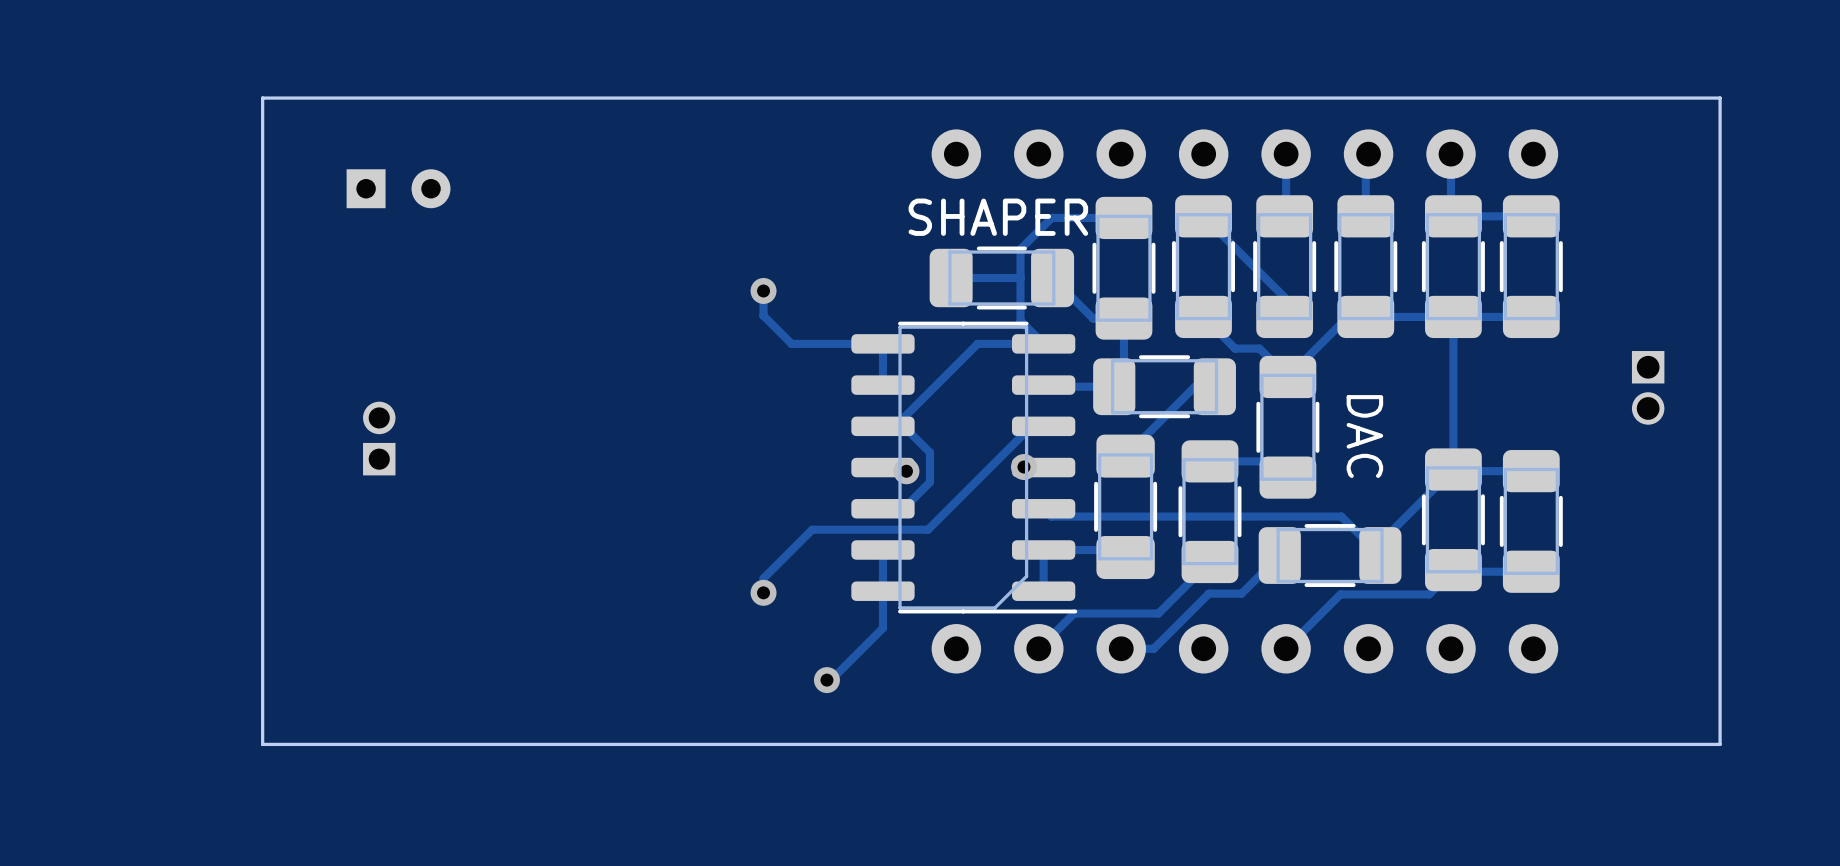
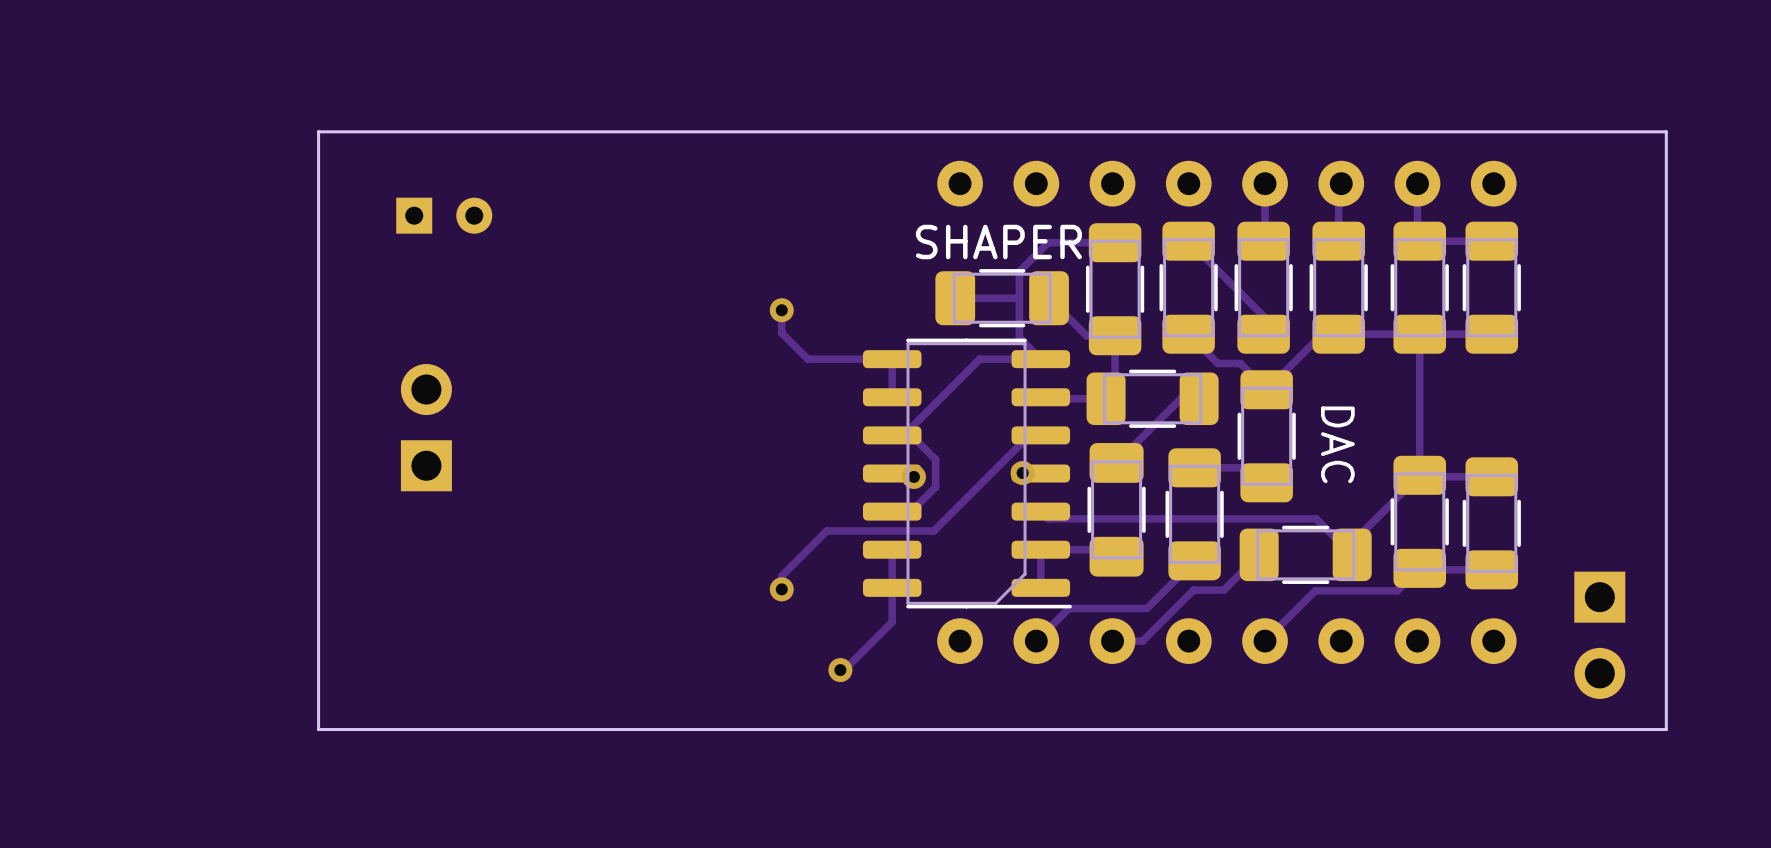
part: (1648, 387) -> none
part footprint: [363, 401, 396, 476] -> [400, 364, 452, 492]
part: none -> (1599, 635)

